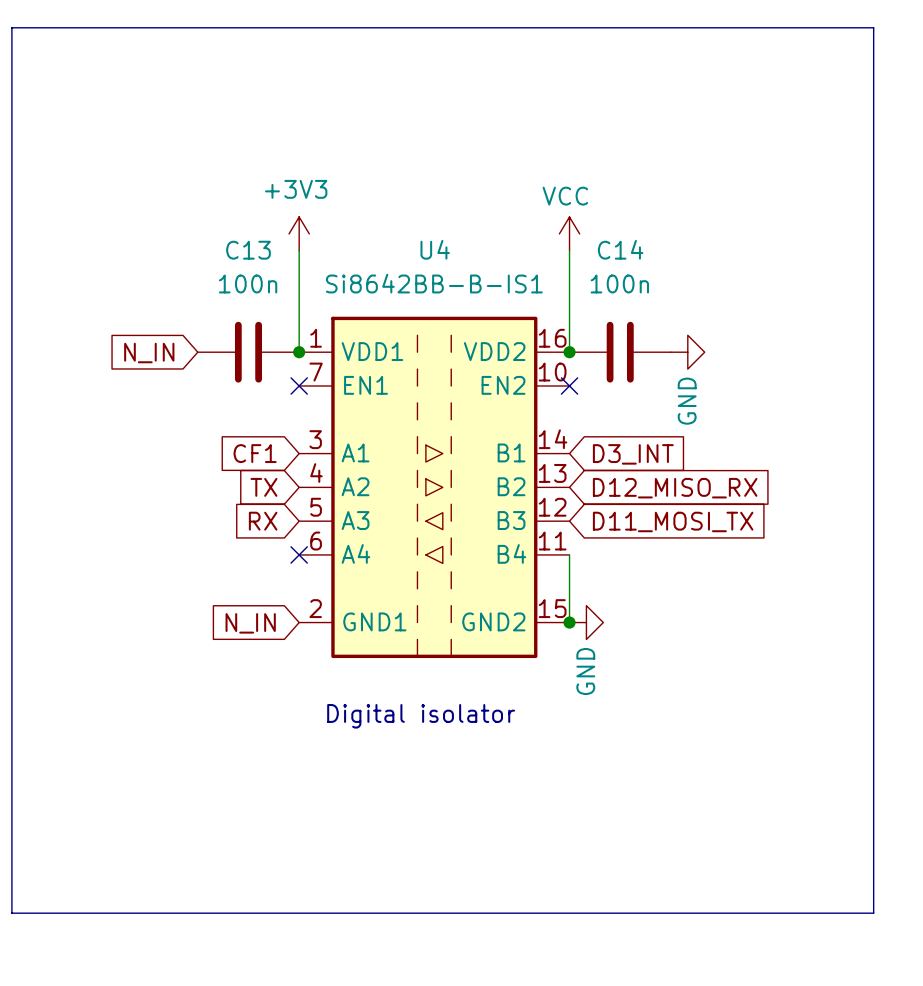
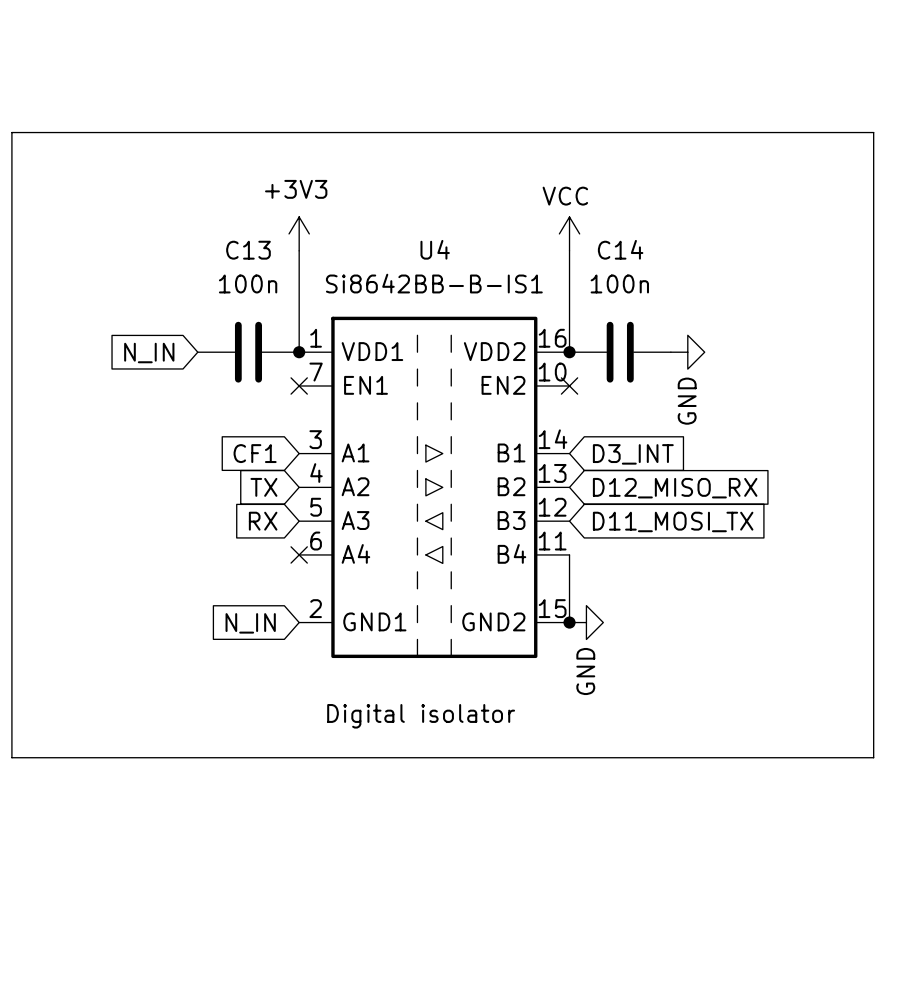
line: (11, 132) (11, 27) (873, 27) (873, 132) -> (11, 132) (873, 132)
line: (11, 757) (11, 913) (873, 913) (873, 757) -> (11, 757) (873, 757)

